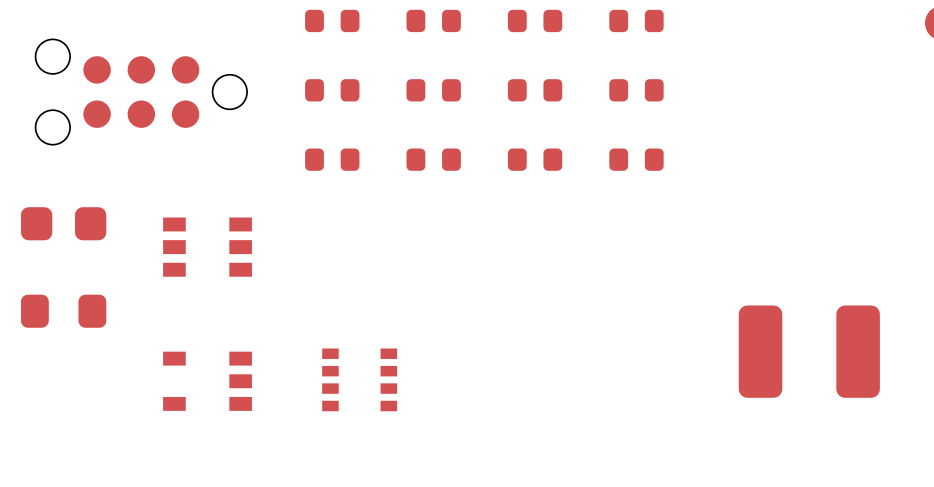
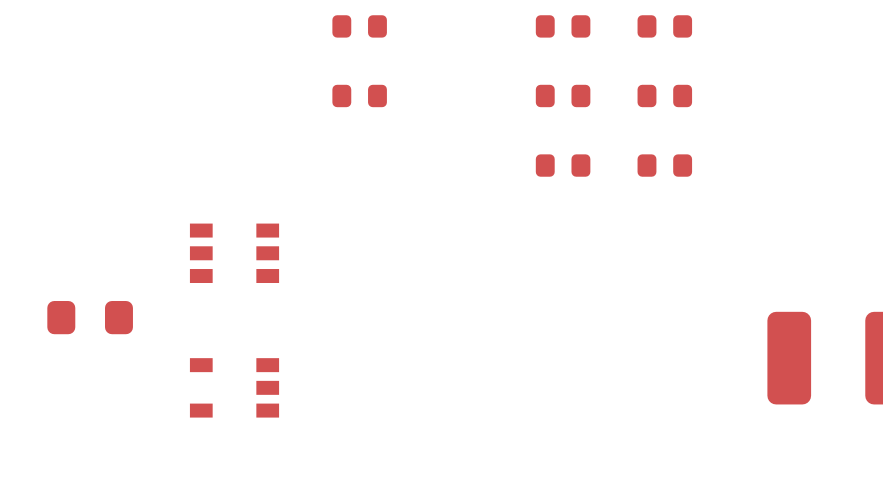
part: (433, 20) -> none
part: (433, 90) -> none
part: (141, 92) -> none
part: (332, 159) -> none
part: (433, 159) -> none
part: (63, 223) -> none
part: (359, 379) -> none

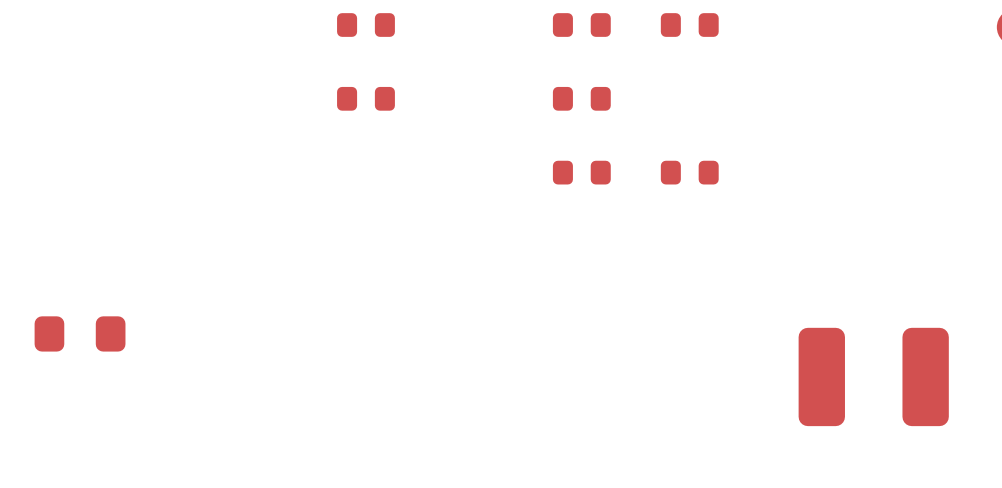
part: (664, 95) -> none
part: (234, 253) -> none
part: (234, 387) -> none

